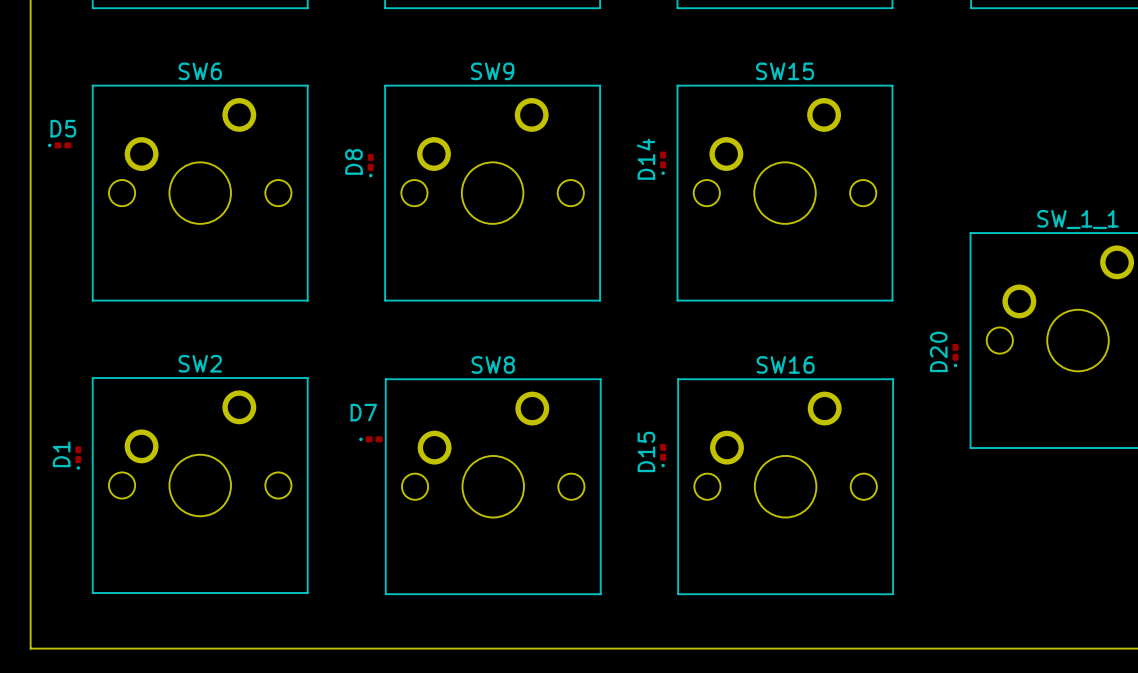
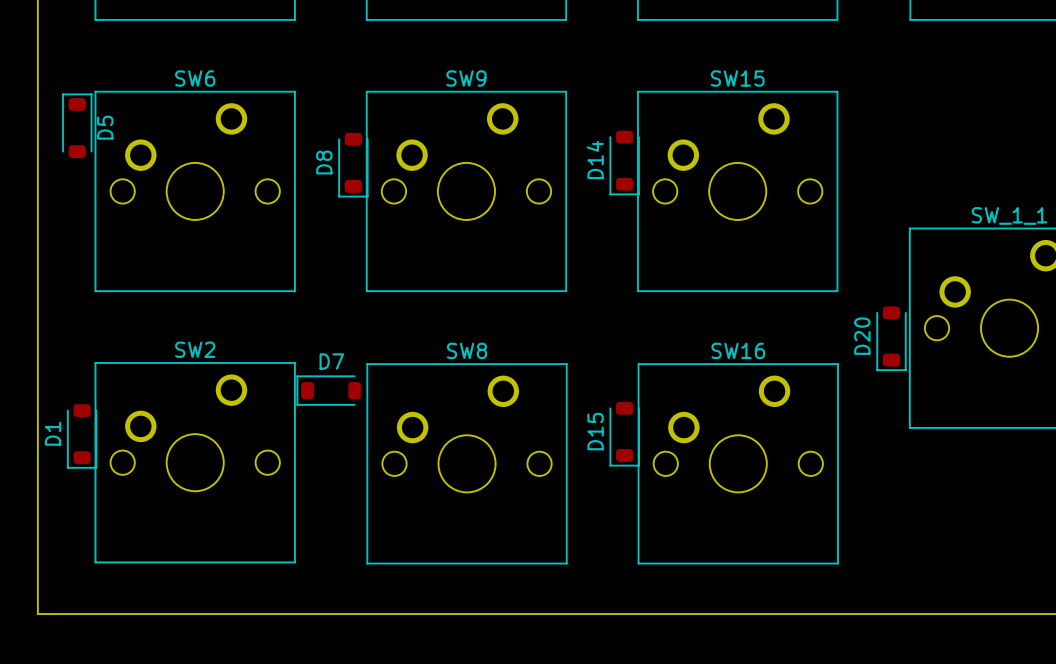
D5 name position: D5 (63, 128) -> D5 (105, 127)
D5 footprint: [48, 142, 72, 149] -> [62, 93, 93, 159]
D14 footprint: [660, 151, 667, 175] -> [609, 130, 640, 196]
D8 footprint: [367, 153, 374, 178] -> [338, 132, 369, 198]
D20 footprint: [952, 343, 959, 368] -> [876, 306, 907, 372]
D7 footprint: [359, 436, 383, 443] -> [296, 375, 362, 406]
D15 footprint: [660, 443, 667, 468] -> [609, 401, 640, 467]
D1 footprint: [75, 446, 82, 470] -> [67, 404, 98, 469]

